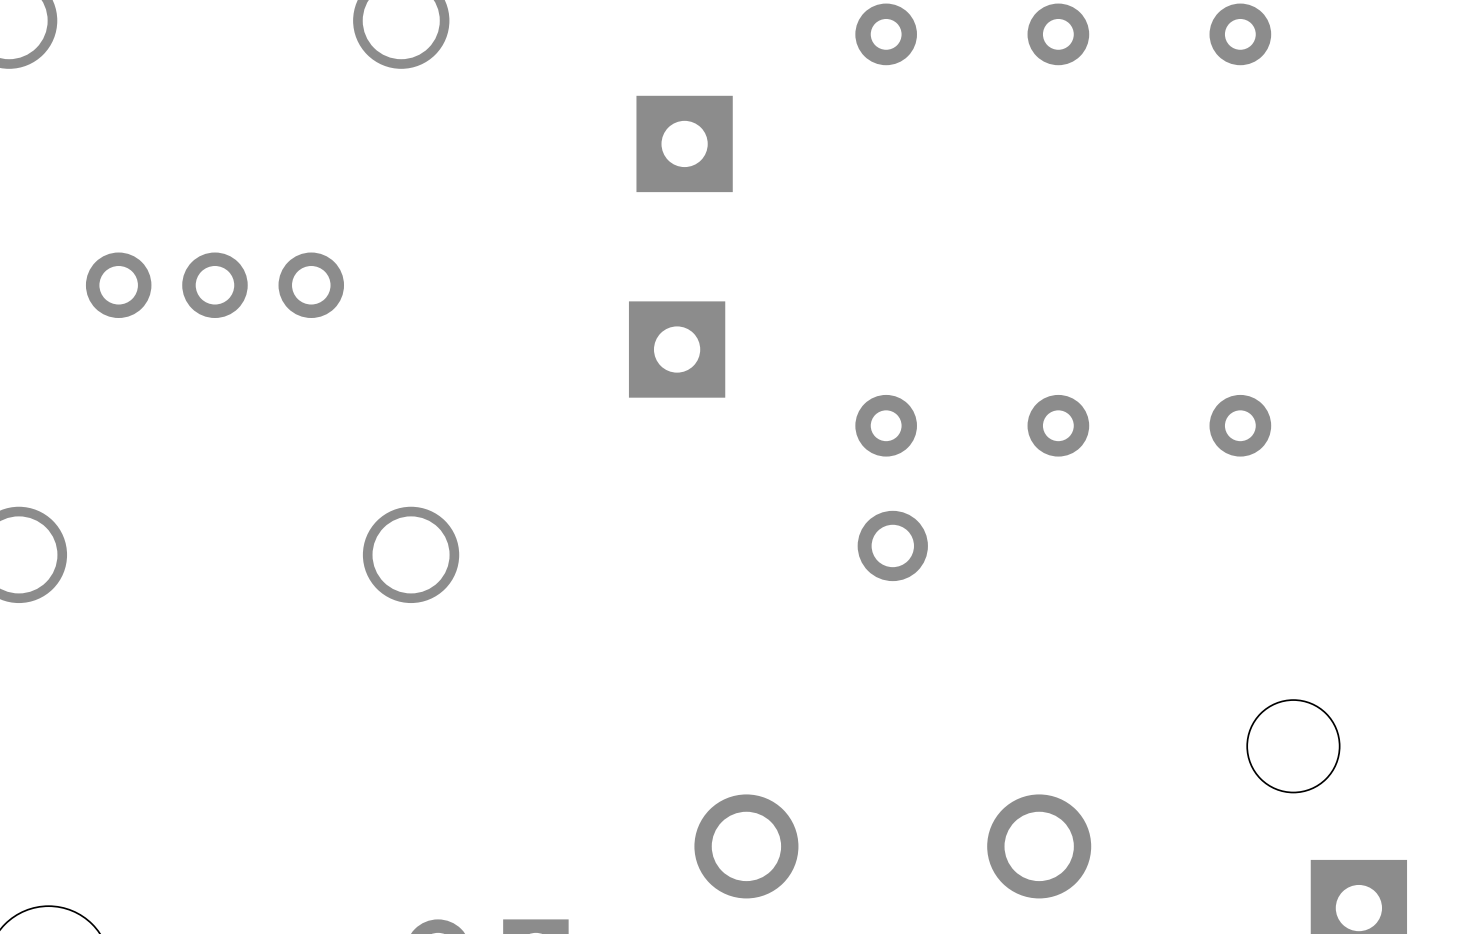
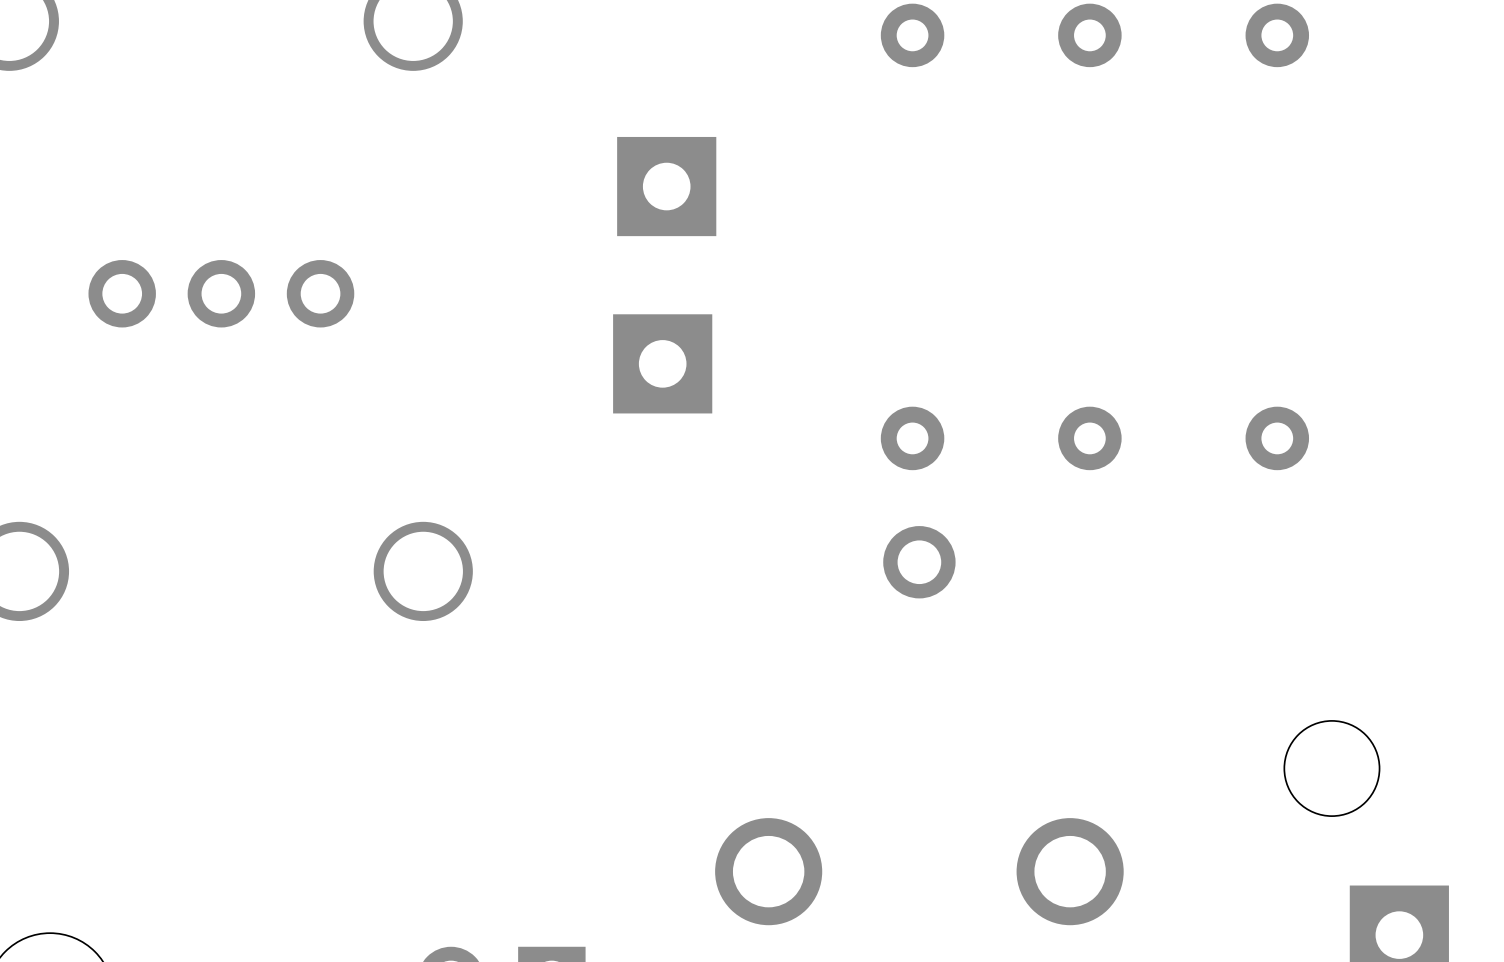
part position: (684, 143) -> (666, 186)
part position: (677, 349) -> (662, 363)

